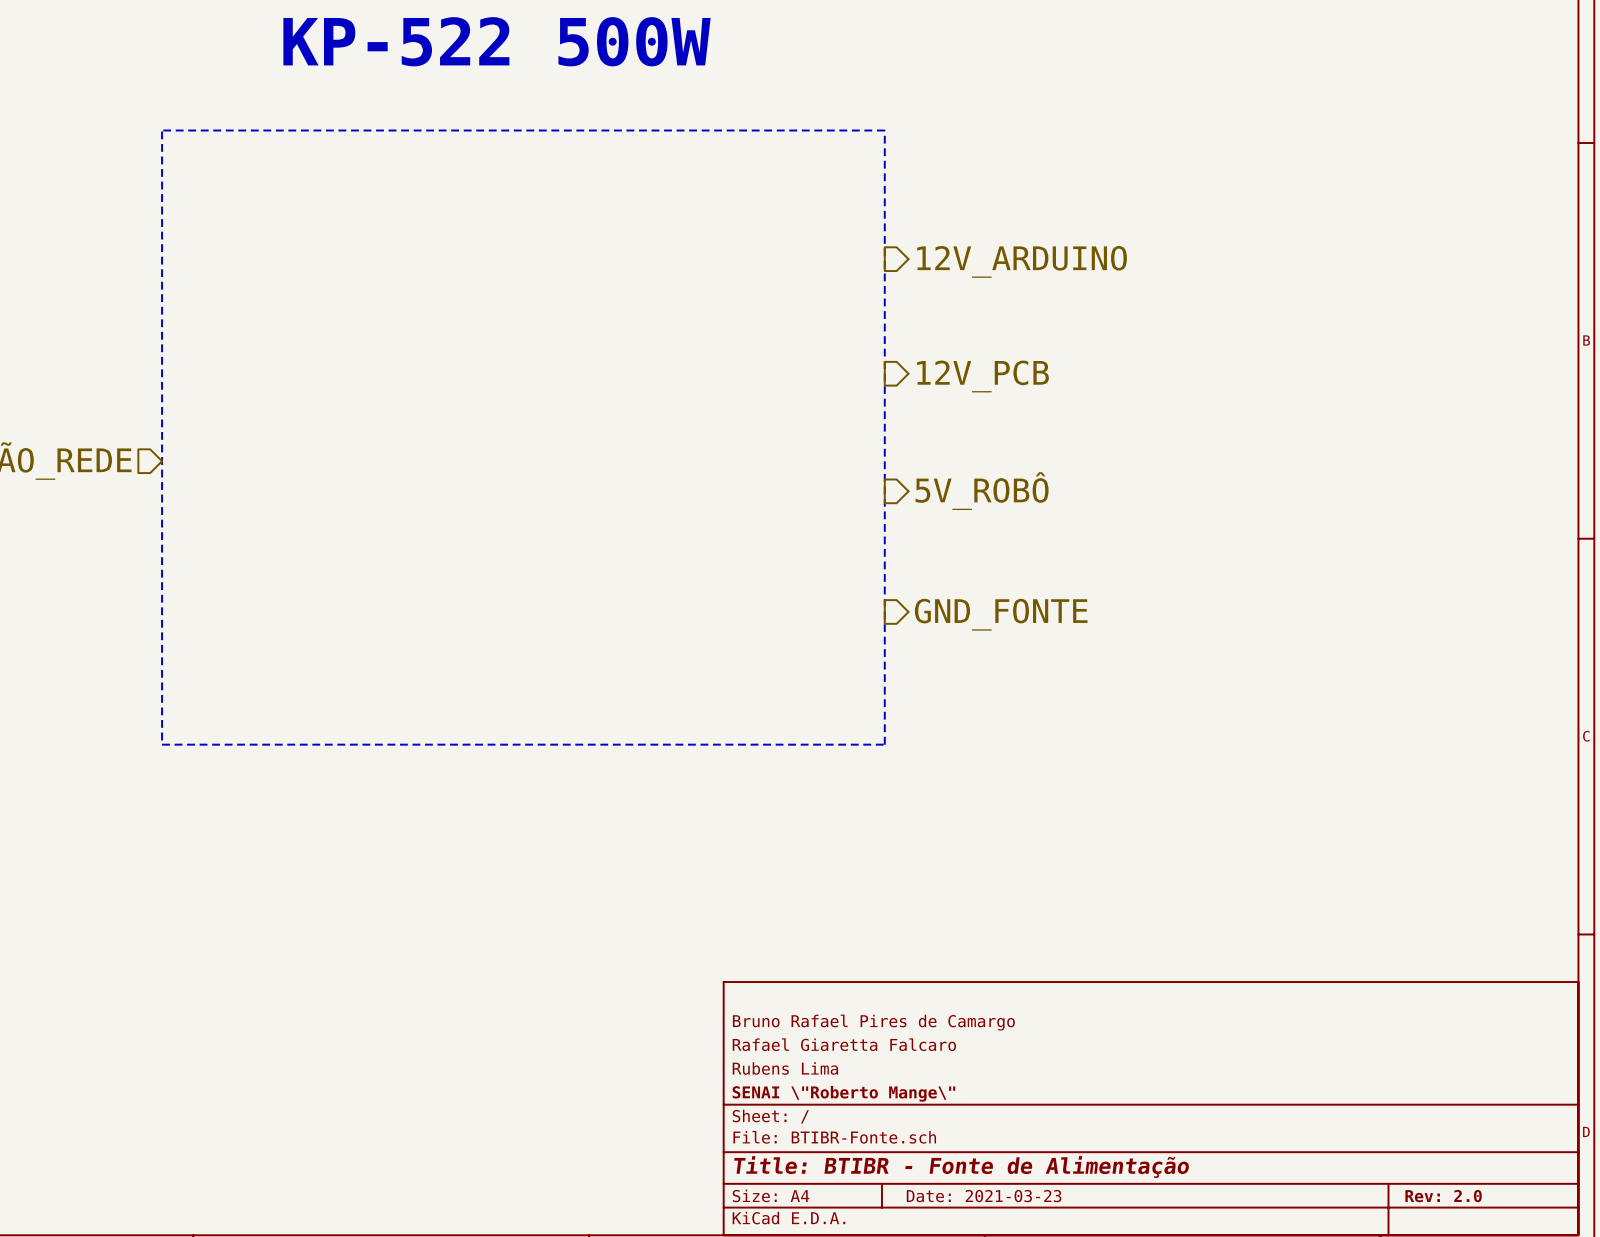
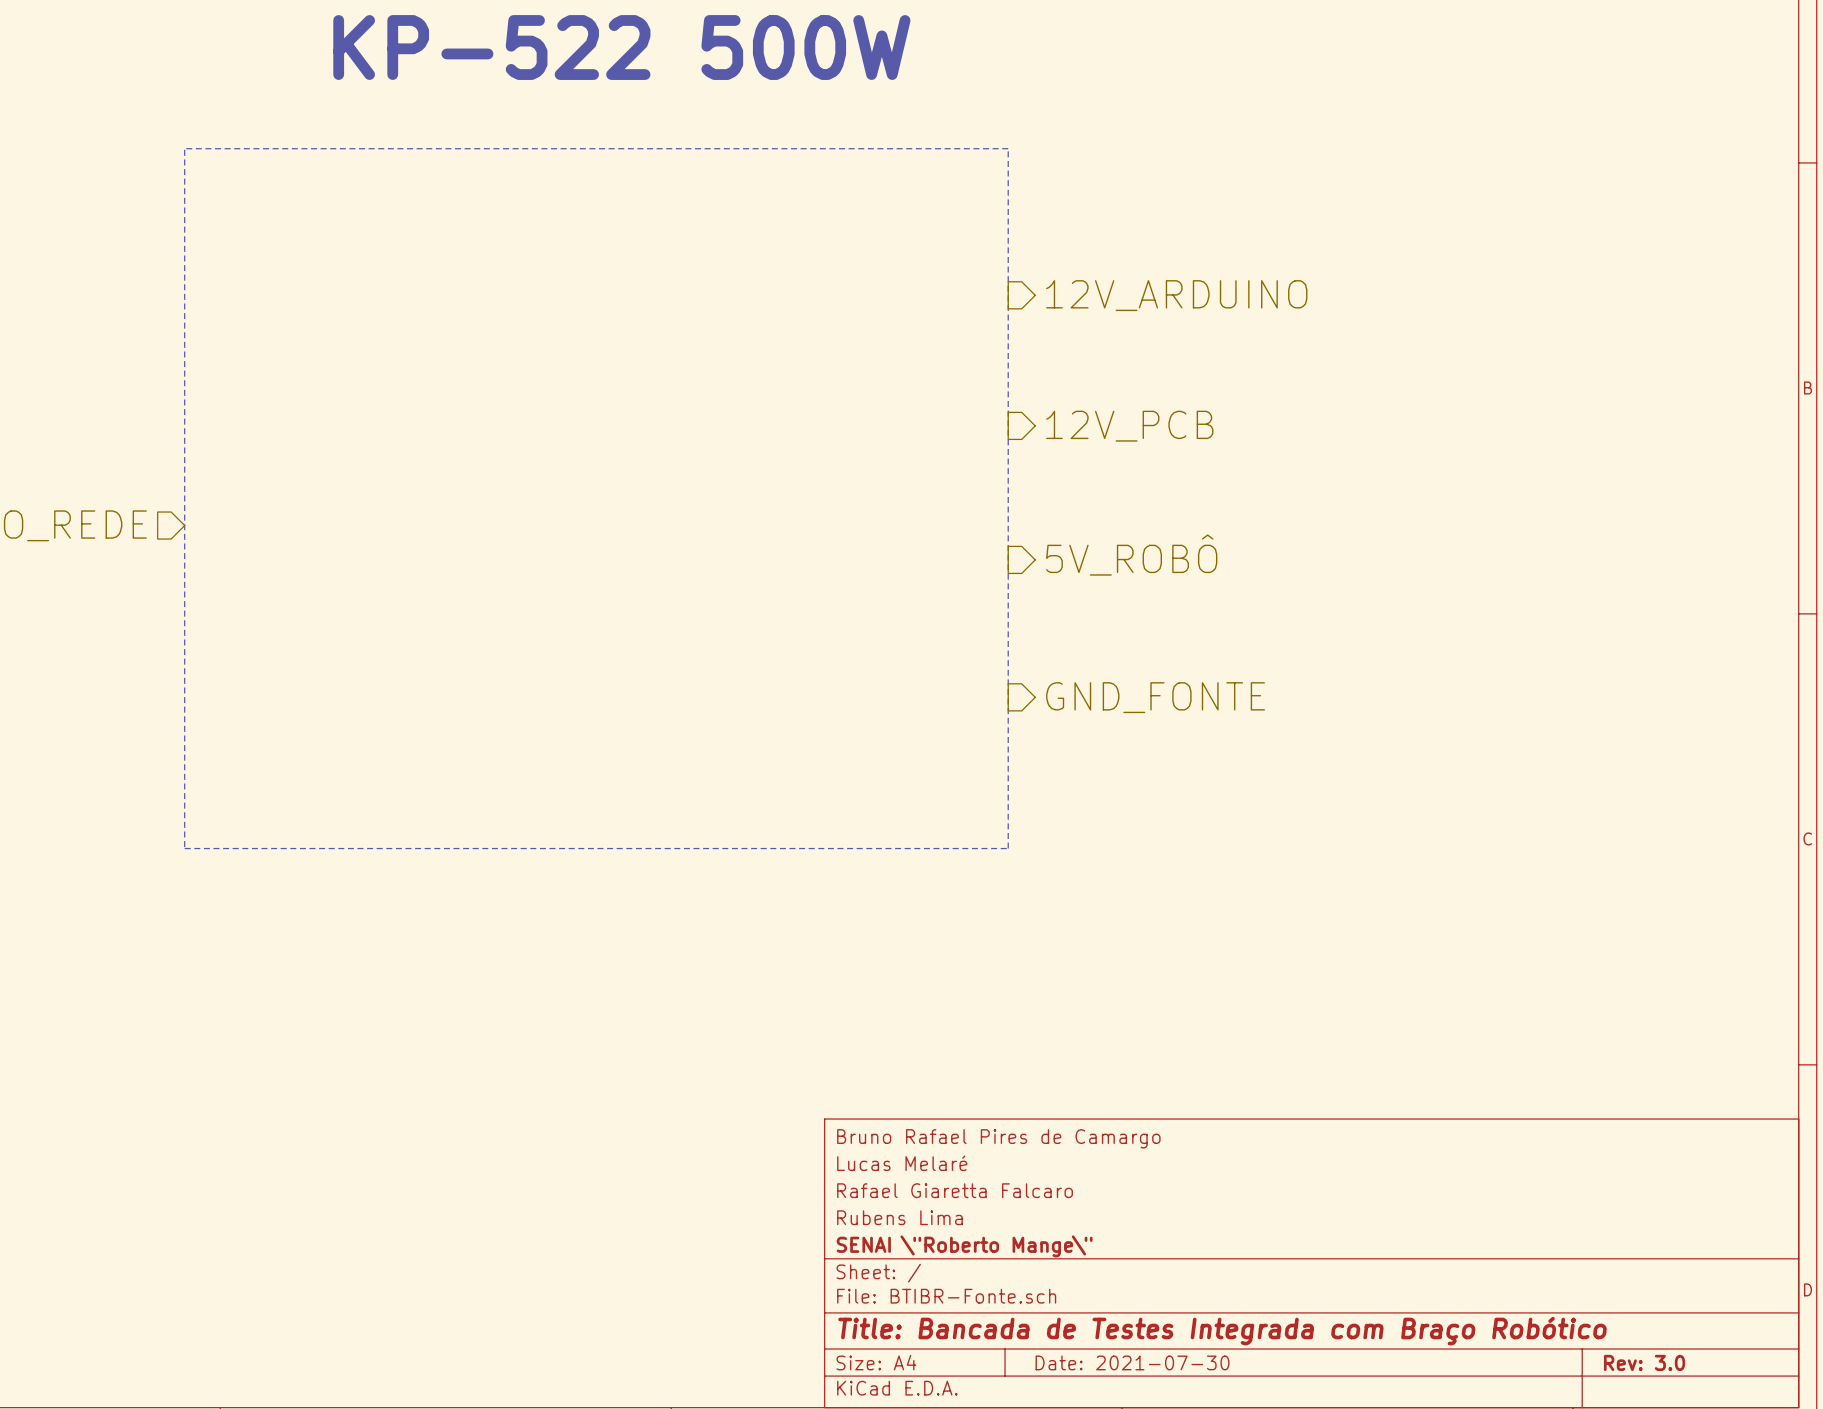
title block: none -> Bruno Rafael Pires de Camargo (998, 1138)
title block: Bruno Rafael Pires de Camargo (873, 1022) -> Lucas Melaré (902, 1163)
title block: Title: BTIBR - Fonte de Alimentação (961, 1167) -> Title: Bancada de Testes Integrada com Braço Robótico (1222, 1331)
title block: Date: 2021-03-23 (984, 1196) -> Date: 2021-07-30 (1132, 1362)
title block: Rev: 2.0 (1443, 1196) -> Rev: 3.0 (1644, 1362)

